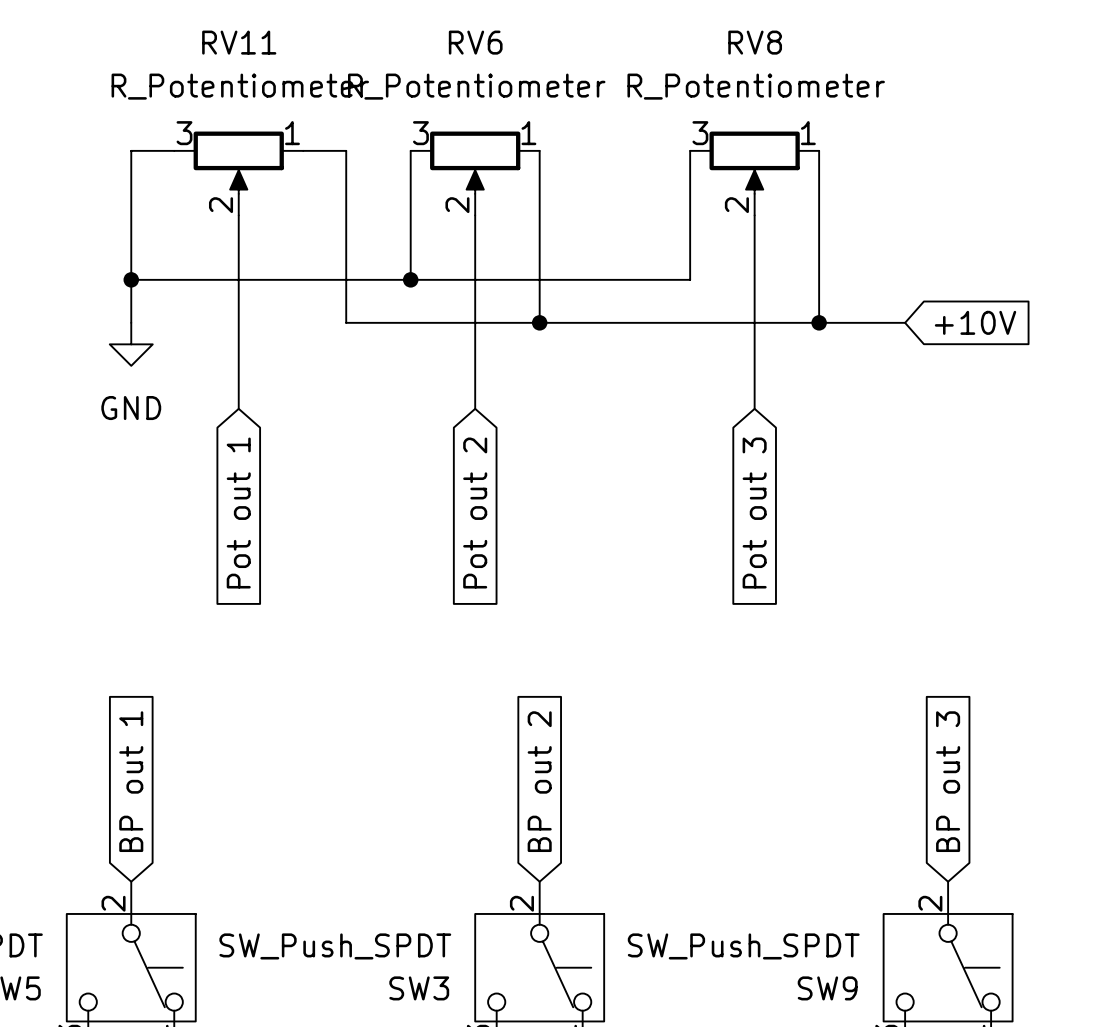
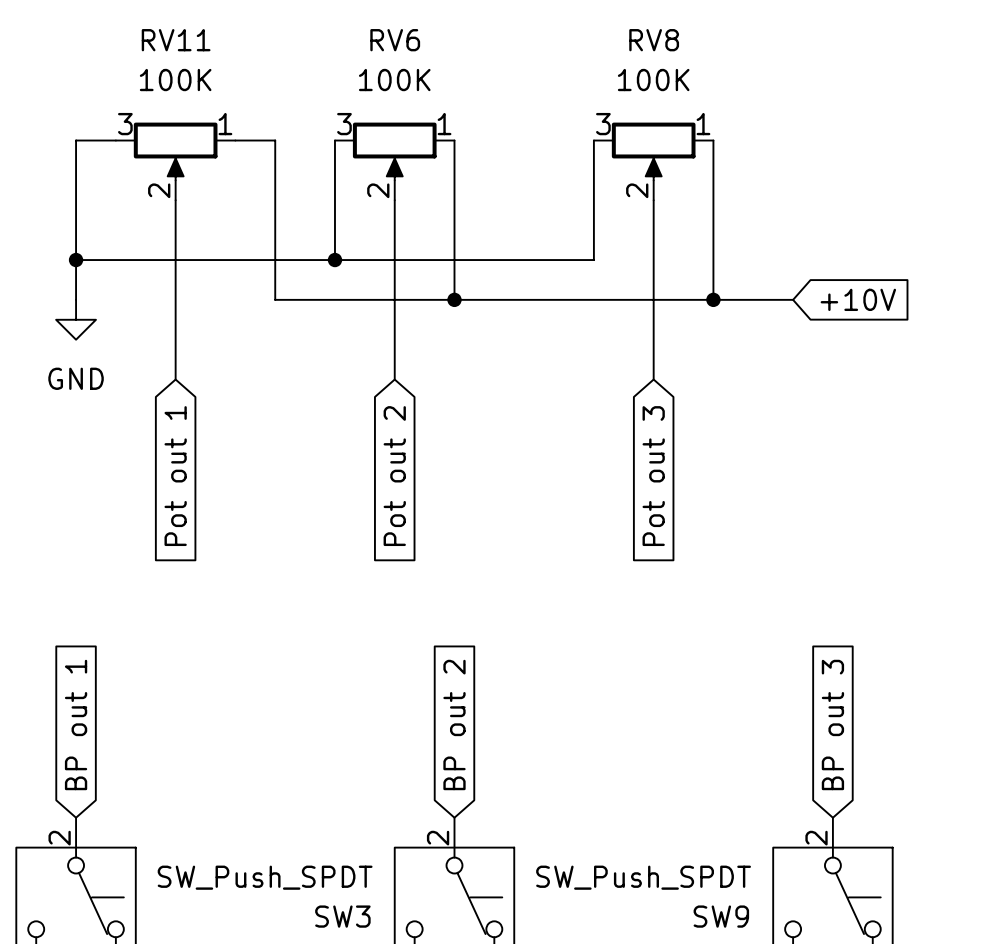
RV11 value: R_Potentiometer (240, 86) -> 100K (175, 80)
RV6 value: R_Potentiometer (476, 86) -> 100K (394, 80)
RV8 value: R_Potentiometer (756, 86) -> 100K (653, 80)

